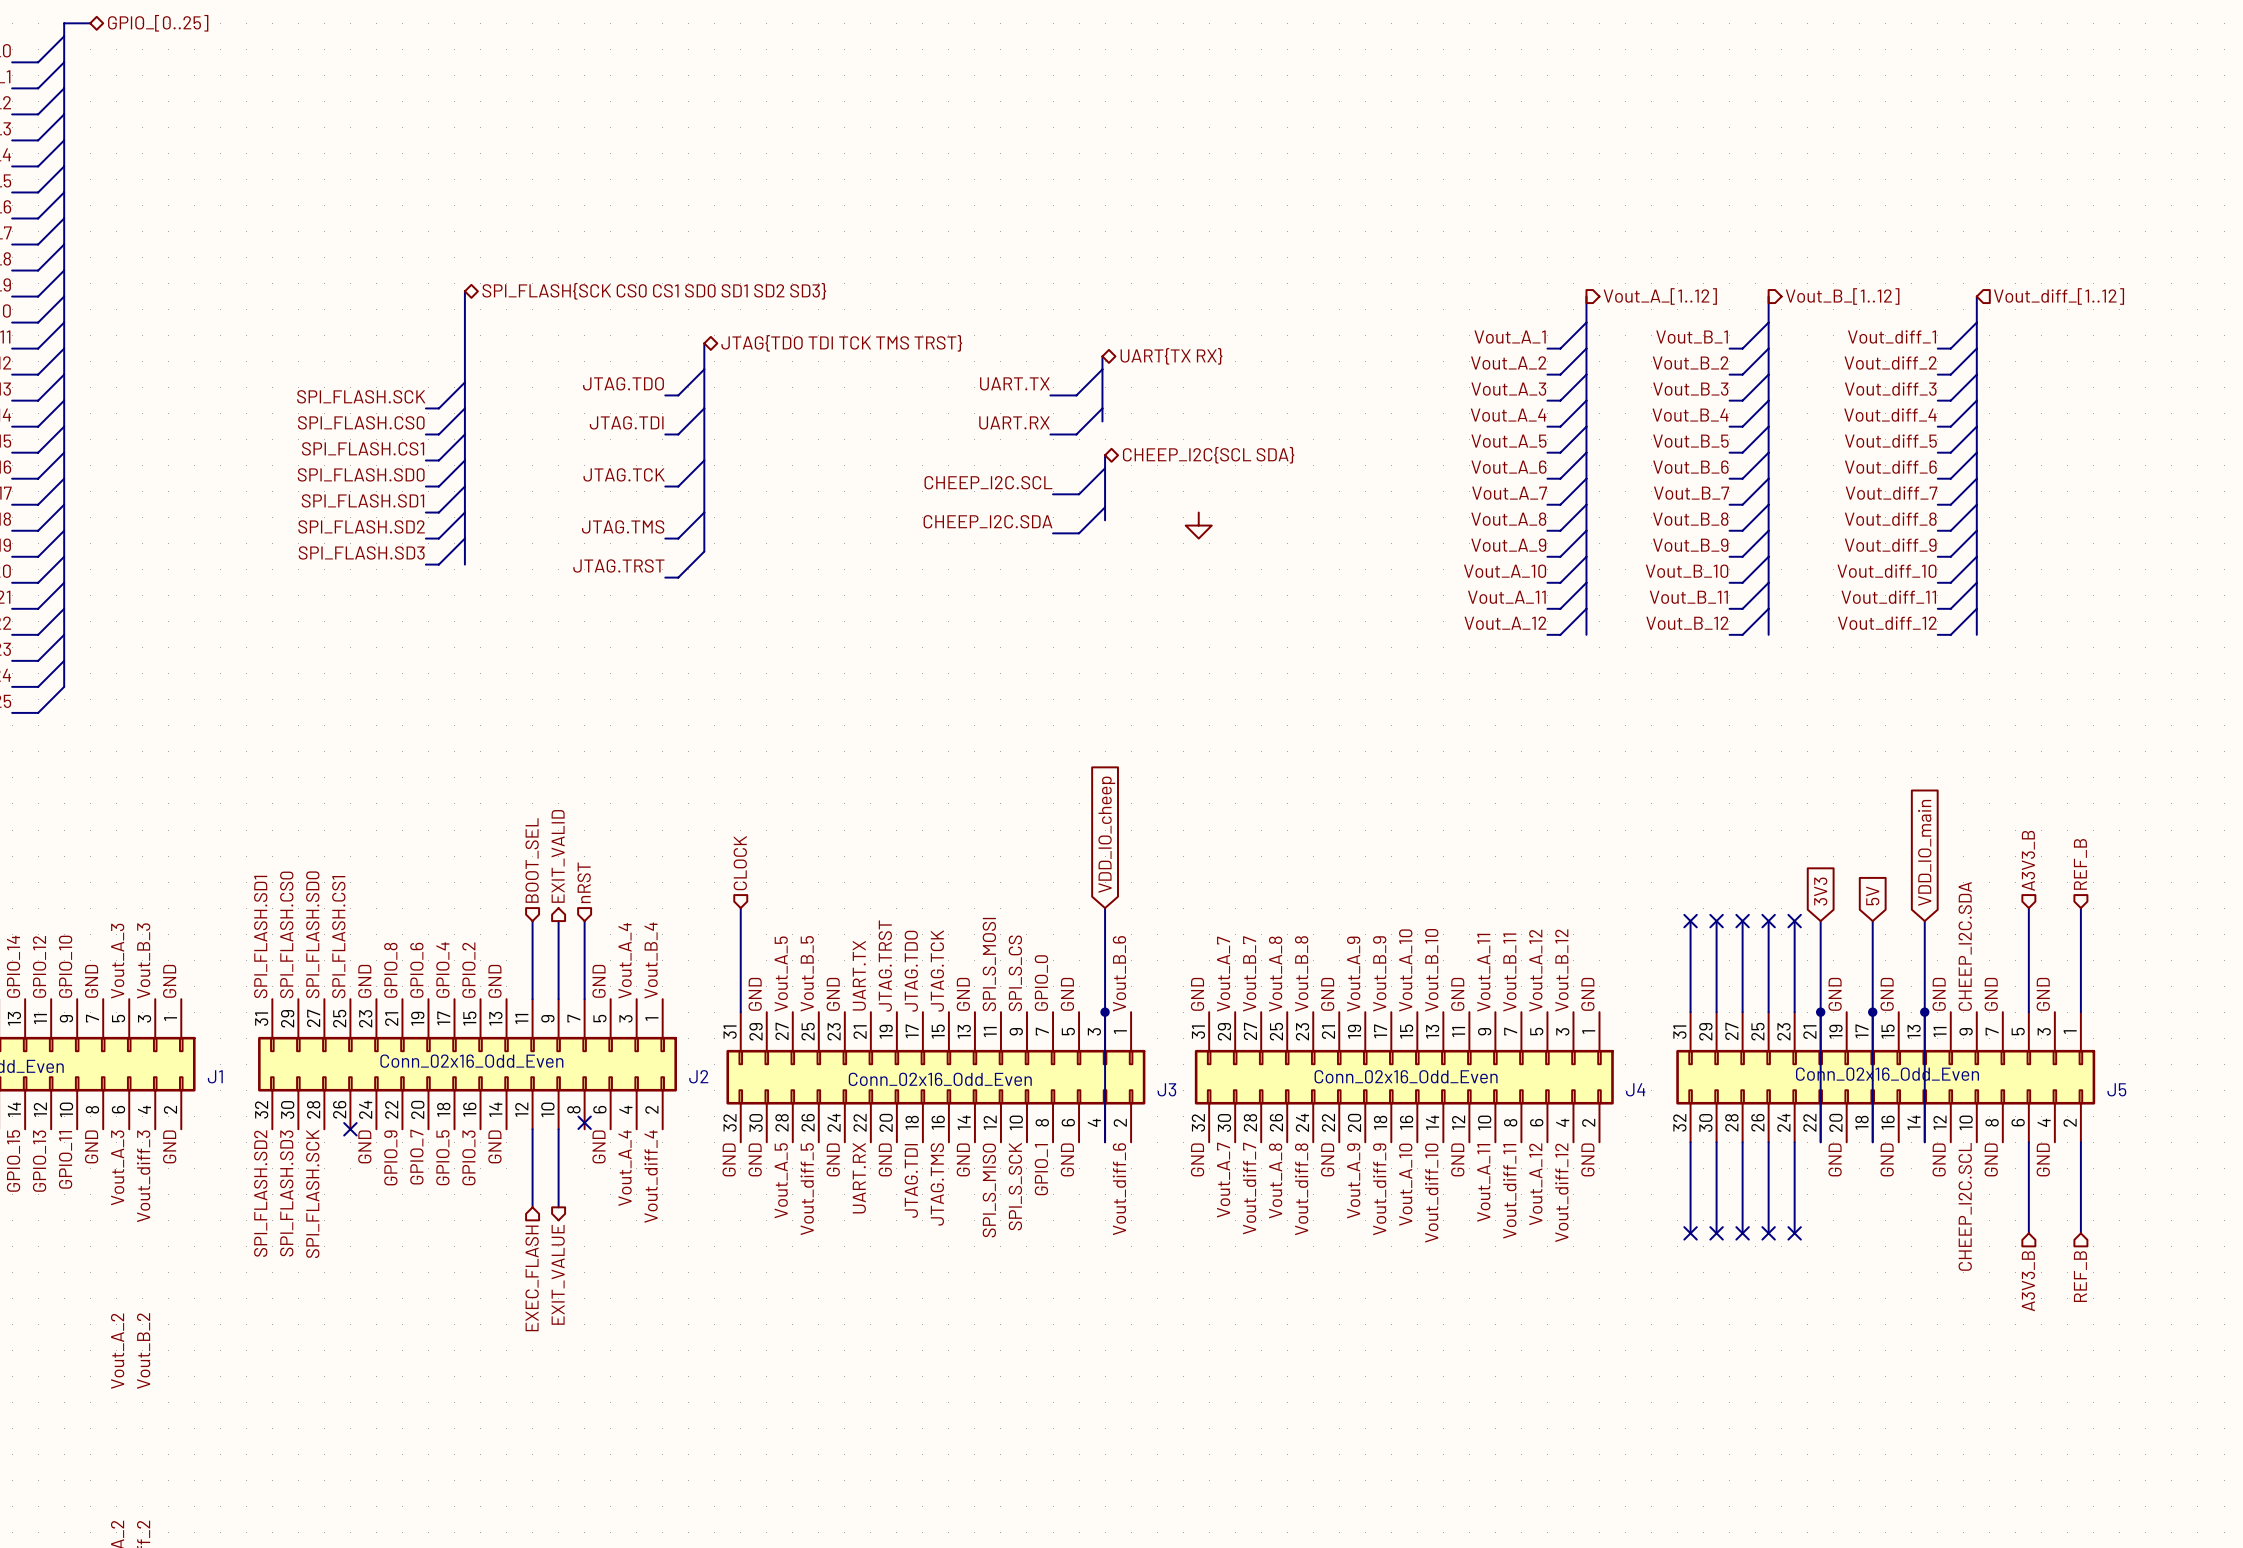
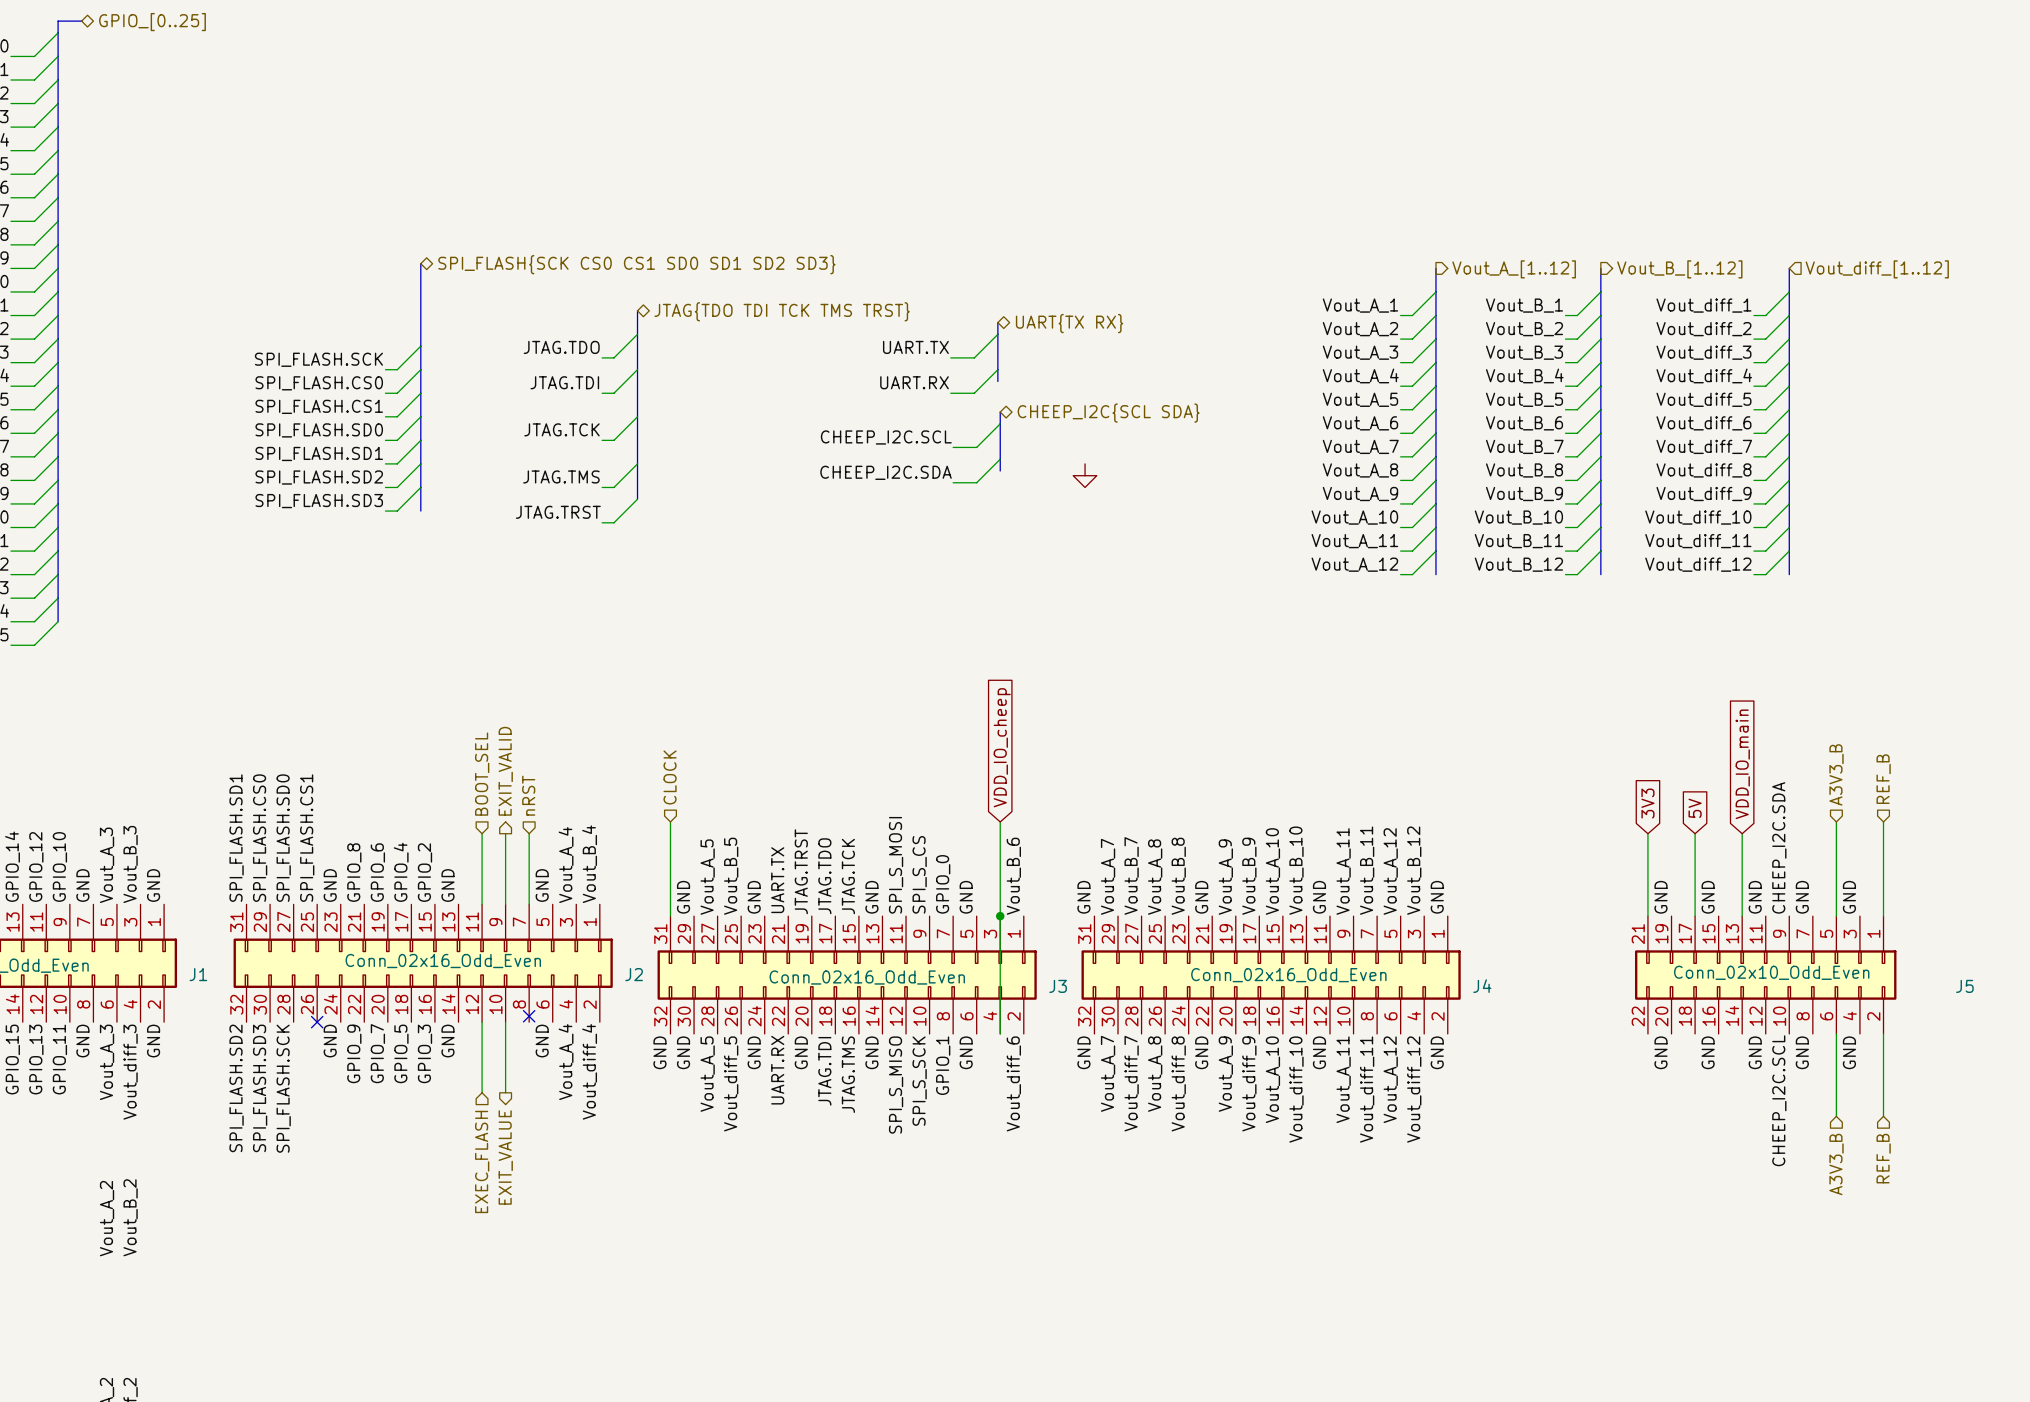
wire: (1690, 921) (1690, 1012) -> none
no-connect mark: (1690, 921) -> none
wire: (1716, 921) (1716, 1012) -> none
no-connect mark: (1716, 921) -> none
wire: (1742, 921) (1742, 1012) -> none
no-connect mark: (1742, 921) -> none
wire: (1768, 921) (1768, 1012) -> none
no-connect mark: (1768, 921) -> none
wire: (1794, 921) (1794, 1012) -> none
no-connect mark: (1794, 921) -> none
J5 symbol: [1676, 1012, 2096, 1143] -> [1635, 916, 1897, 1034]
junction: (1820, 1012) -> none
junction: (1872, 1012) -> none
junction: (1924, 1012) -> none
J5 value: Conn_02x16_Odd_Even (1887, 1074) -> Conn_02x10_Odd_Even (1771, 972)
wire: (1690, 1142) (1690, 1233) -> none
wire: (1716, 1142) (1716, 1233) -> none
wire: (1742, 1142) (1742, 1233) -> none
wire: (1768, 1142) (1768, 1233) -> none
wire: (1794, 1142) (1794, 1233) -> none
no-connect mark: (1690, 1233) -> none
no-connect mark: (1716, 1233) -> none
no-connect mark: (1742, 1233) -> none
no-connect mark: (1768, 1233) -> none
no-connect mark: (1794, 1233) -> none

